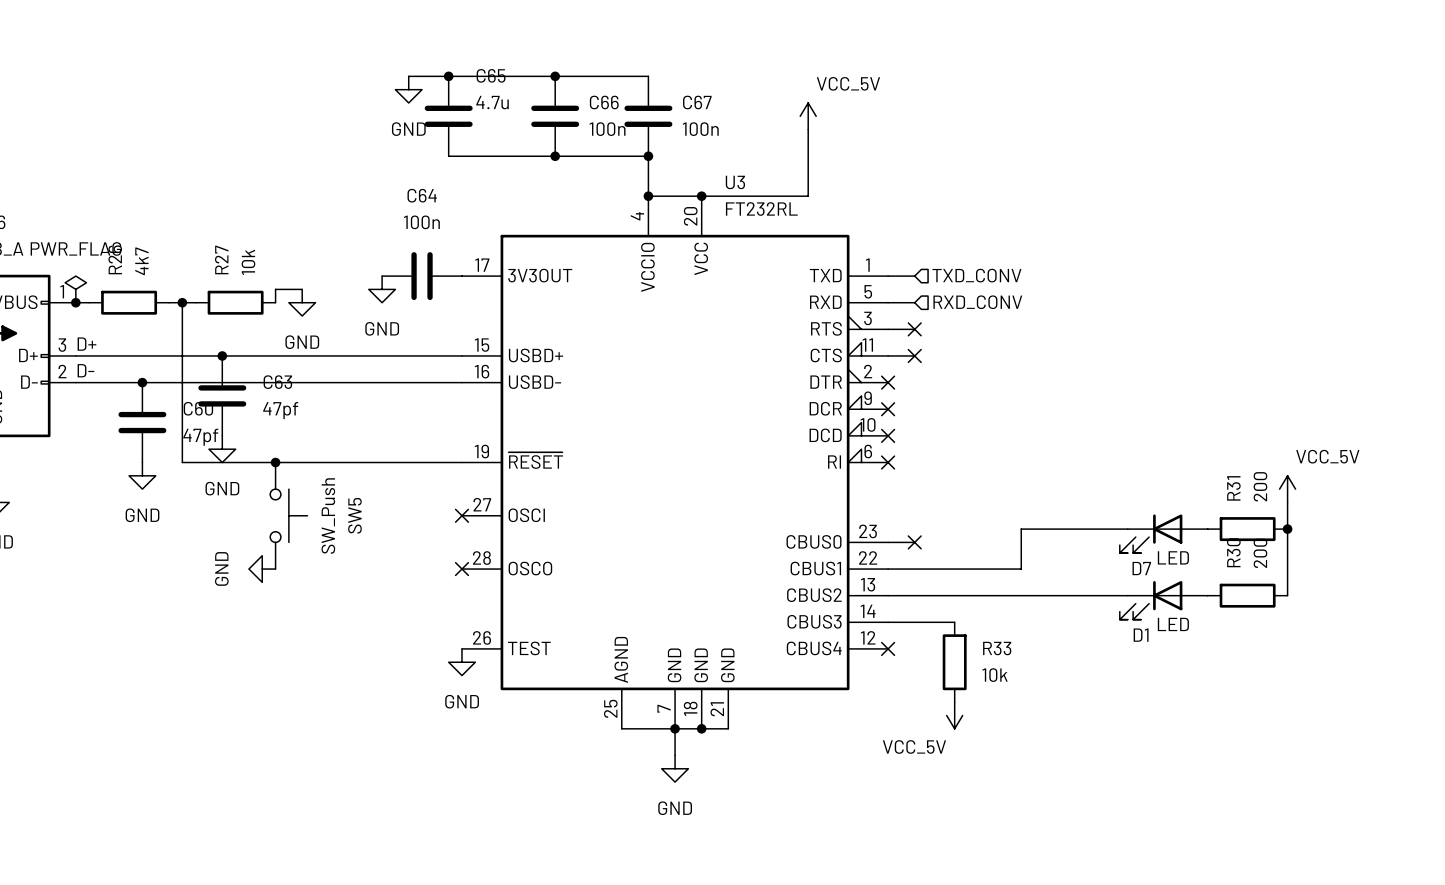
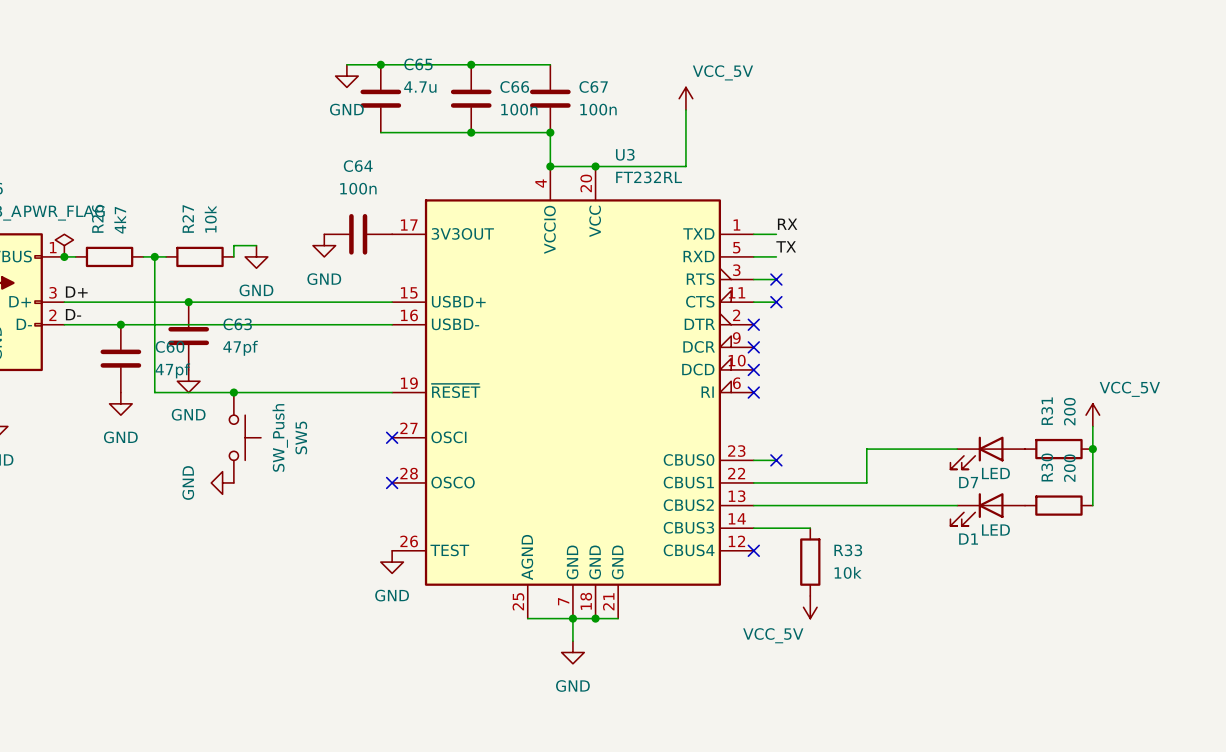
label: none -> RX (787, 224)
hierarchical label: TXD_CONV (976, 275) -> none
label: none -> TX (786, 246)
hierarchical label: RXD_CONV (977, 302) -> none

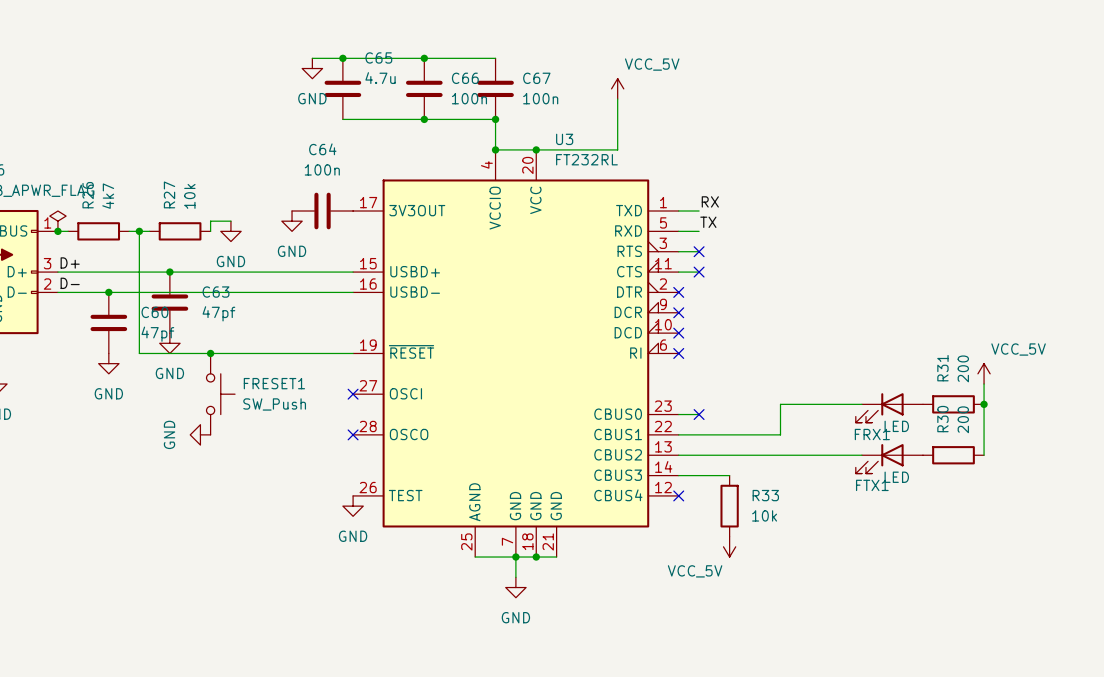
SW5 value rotation: 0° (280, 437) -> 90° clockwise (274, 404)
SW5 name: SW5 (301, 437) -> FRESET1 (274, 383)
D7 name: D7 (968, 482) -> FRX1 (872, 434)
D1 name: D1 (968, 539) -> FTX1 (872, 485)

